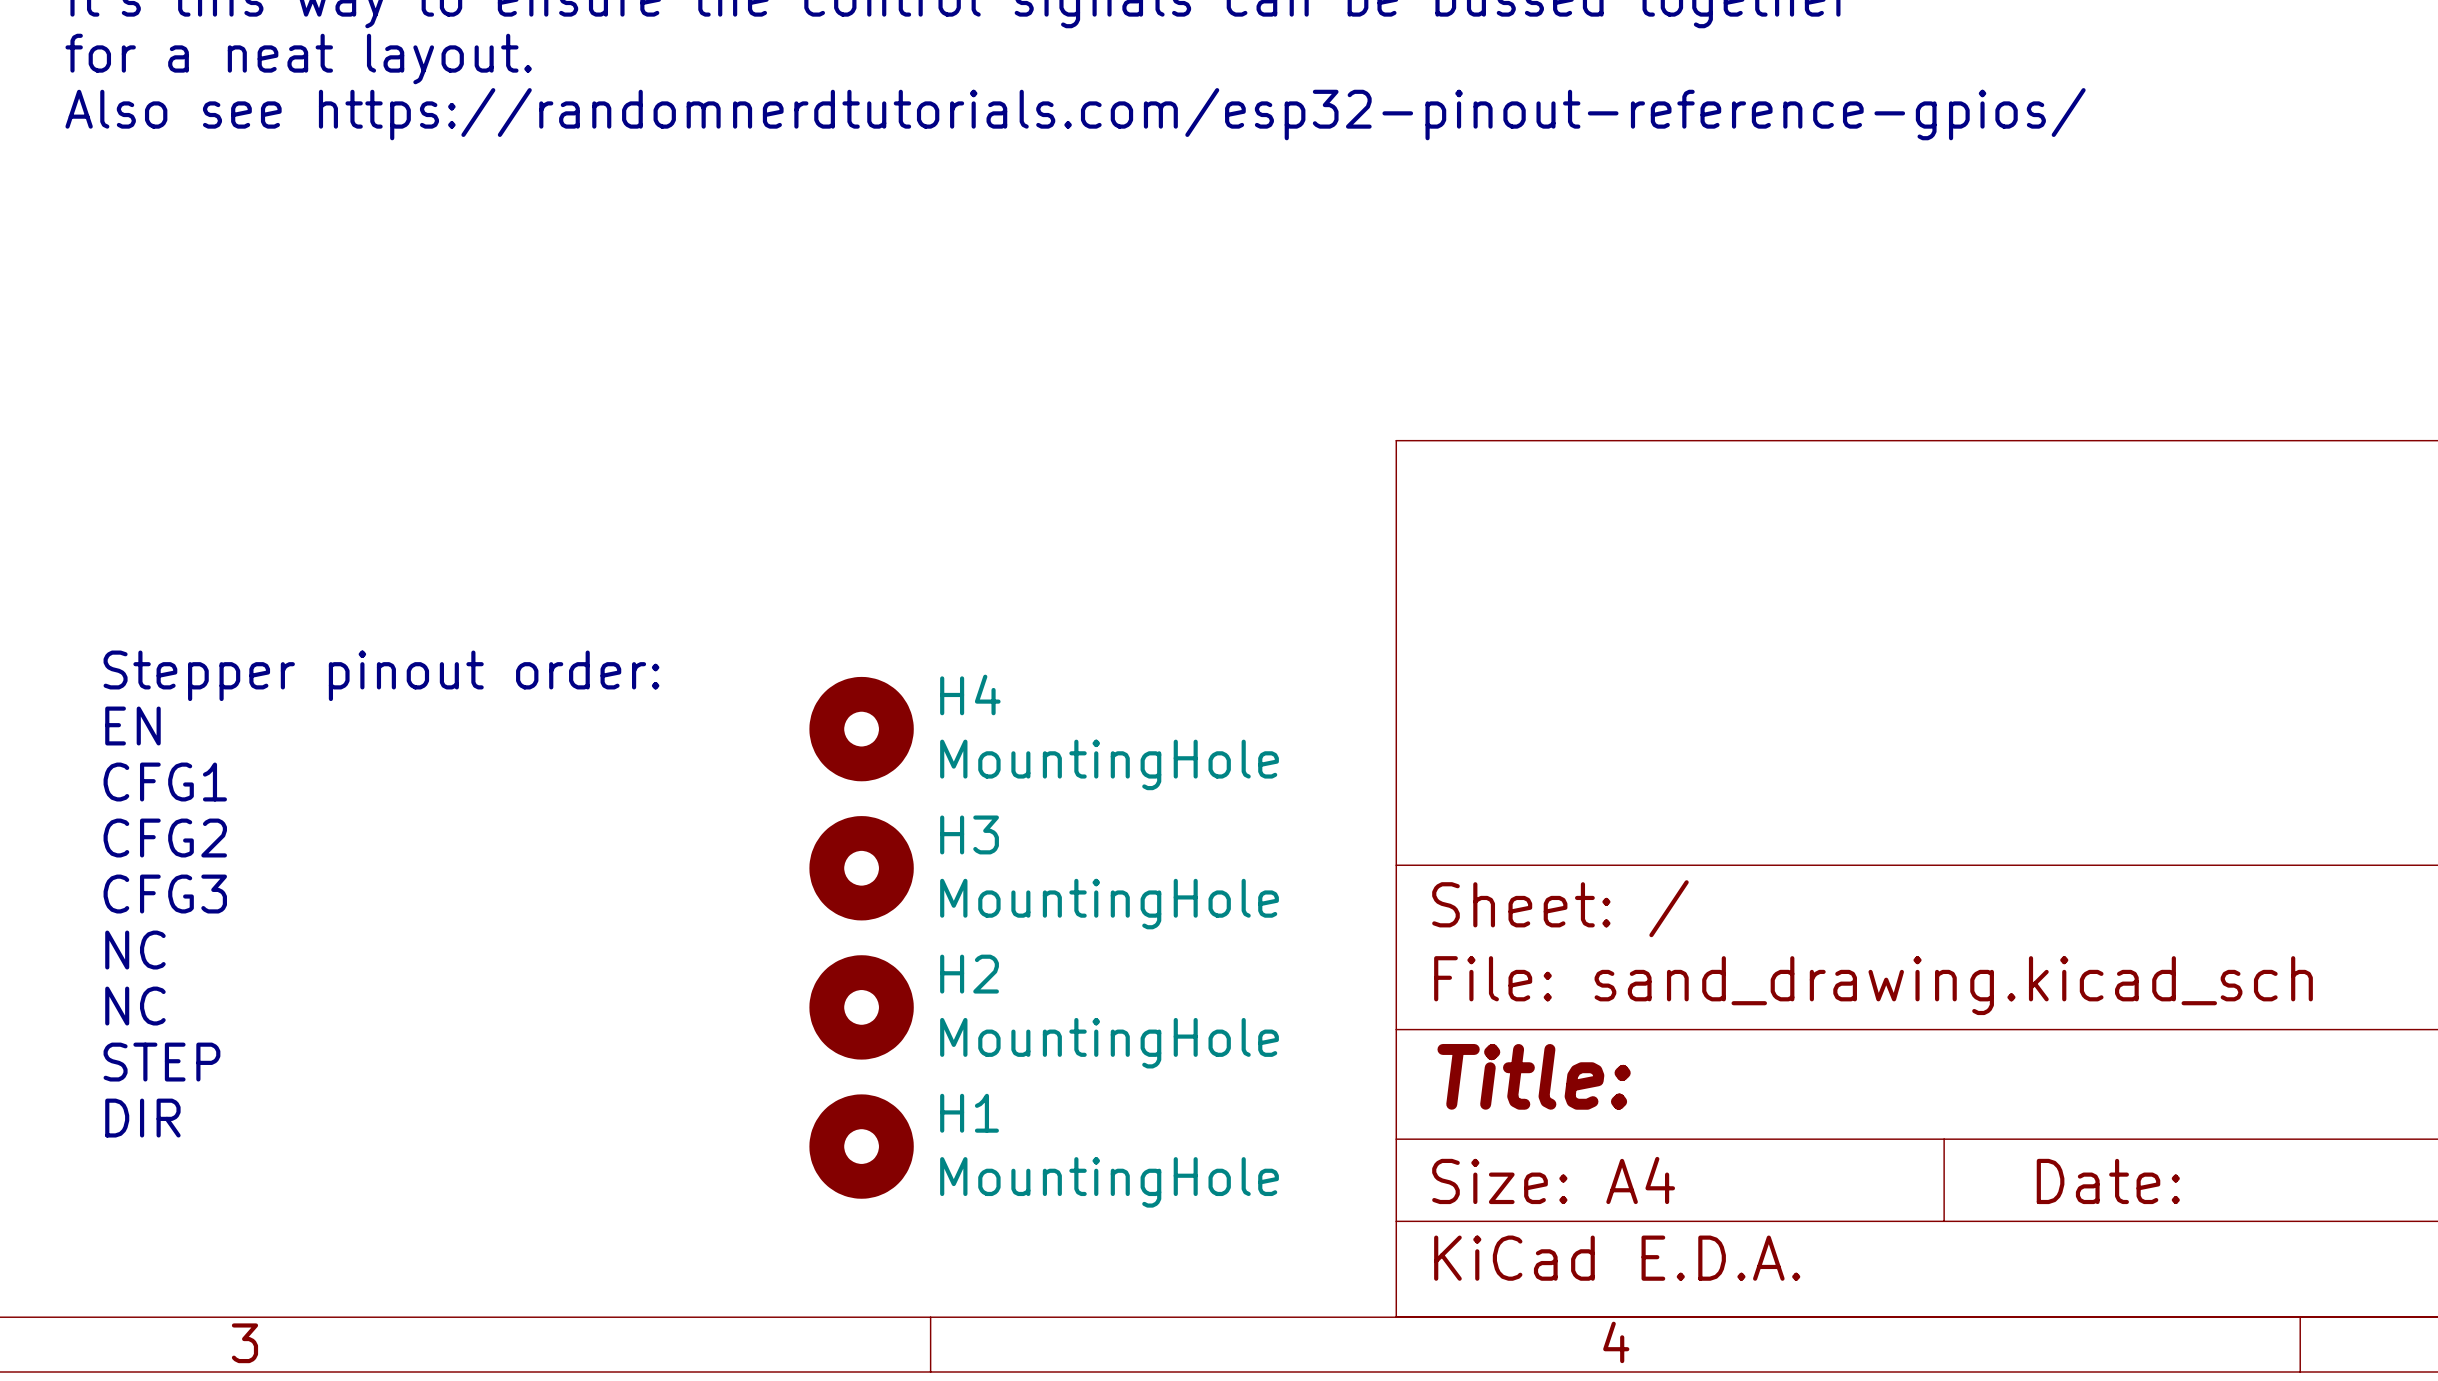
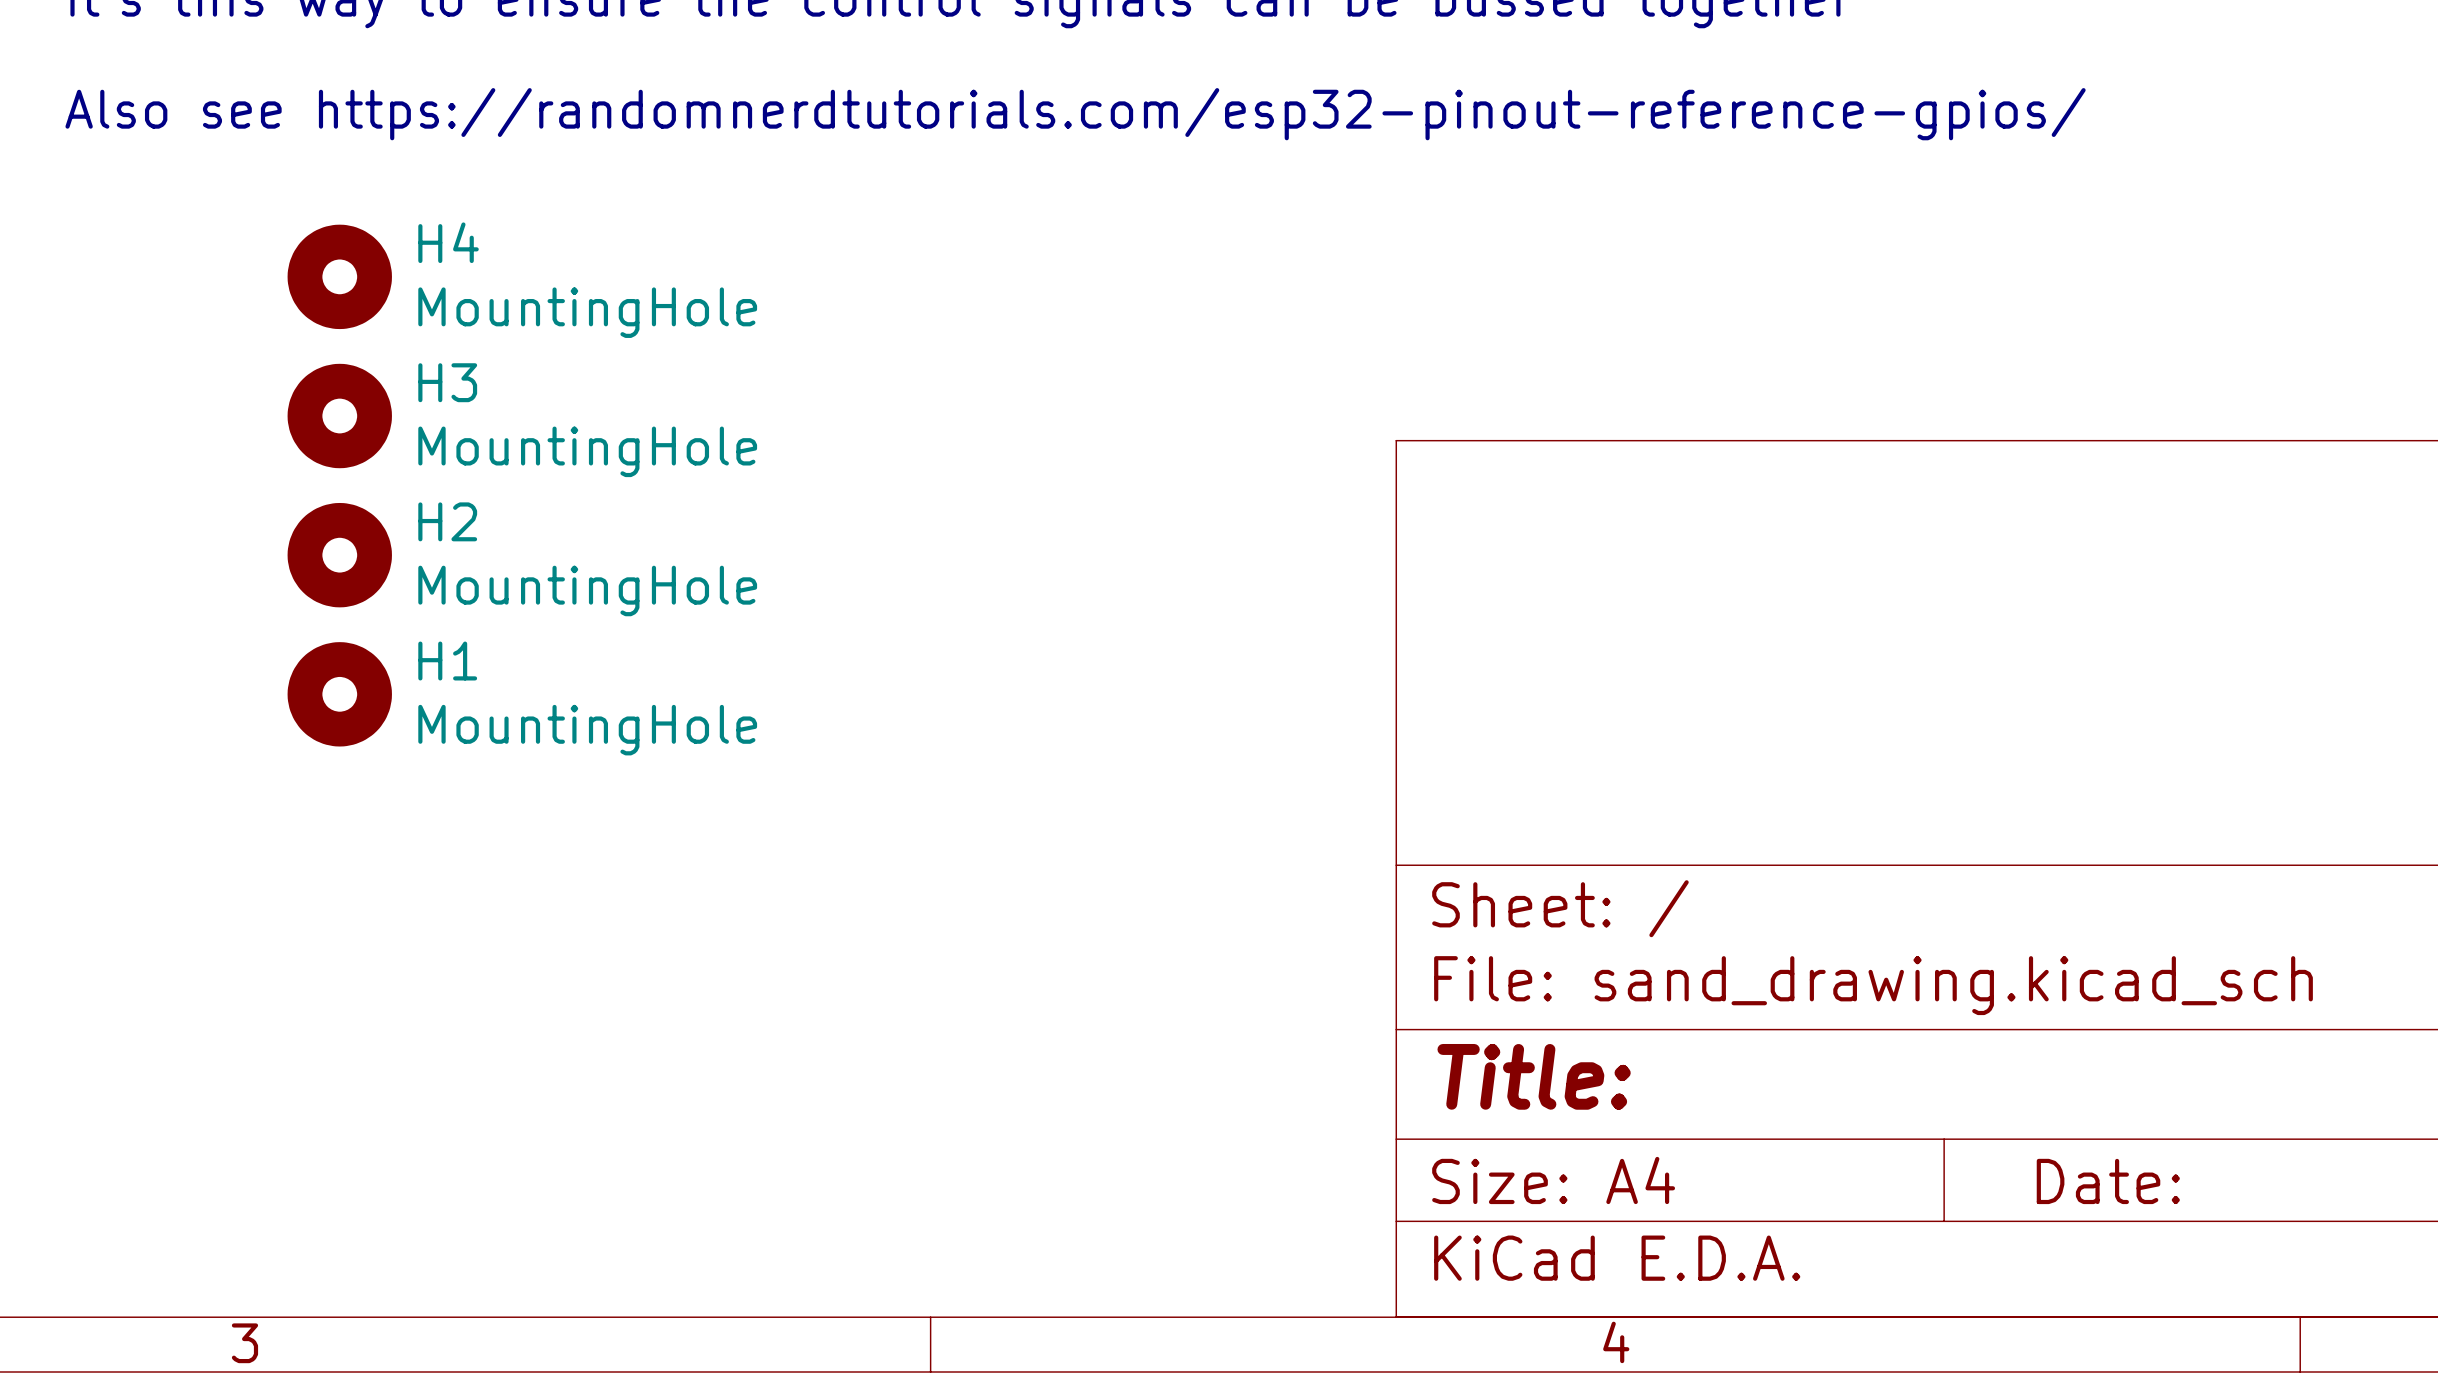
text: for a neat layout. (298, 59) -> none
text: Stepper pinout order: (381, 675) -> none
text: EN (132, 726) -> none
H4 position: (861, 729) -> (339, 276)
text: CFG1 (165, 782) -> none
text: CFG2 (165, 838) -> none
H3 position: (861, 868) -> (339, 416)
text: CFG3 (165, 894) -> none
text: NC (135, 950) -> none
text: NC (135, 1006) -> none
H2 position: (861, 1007) -> (339, 555)
text: STEP (161, 1062) -> none
text: DIR (142, 1118) -> none
H1 position: (861, 1146) -> (339, 694)

